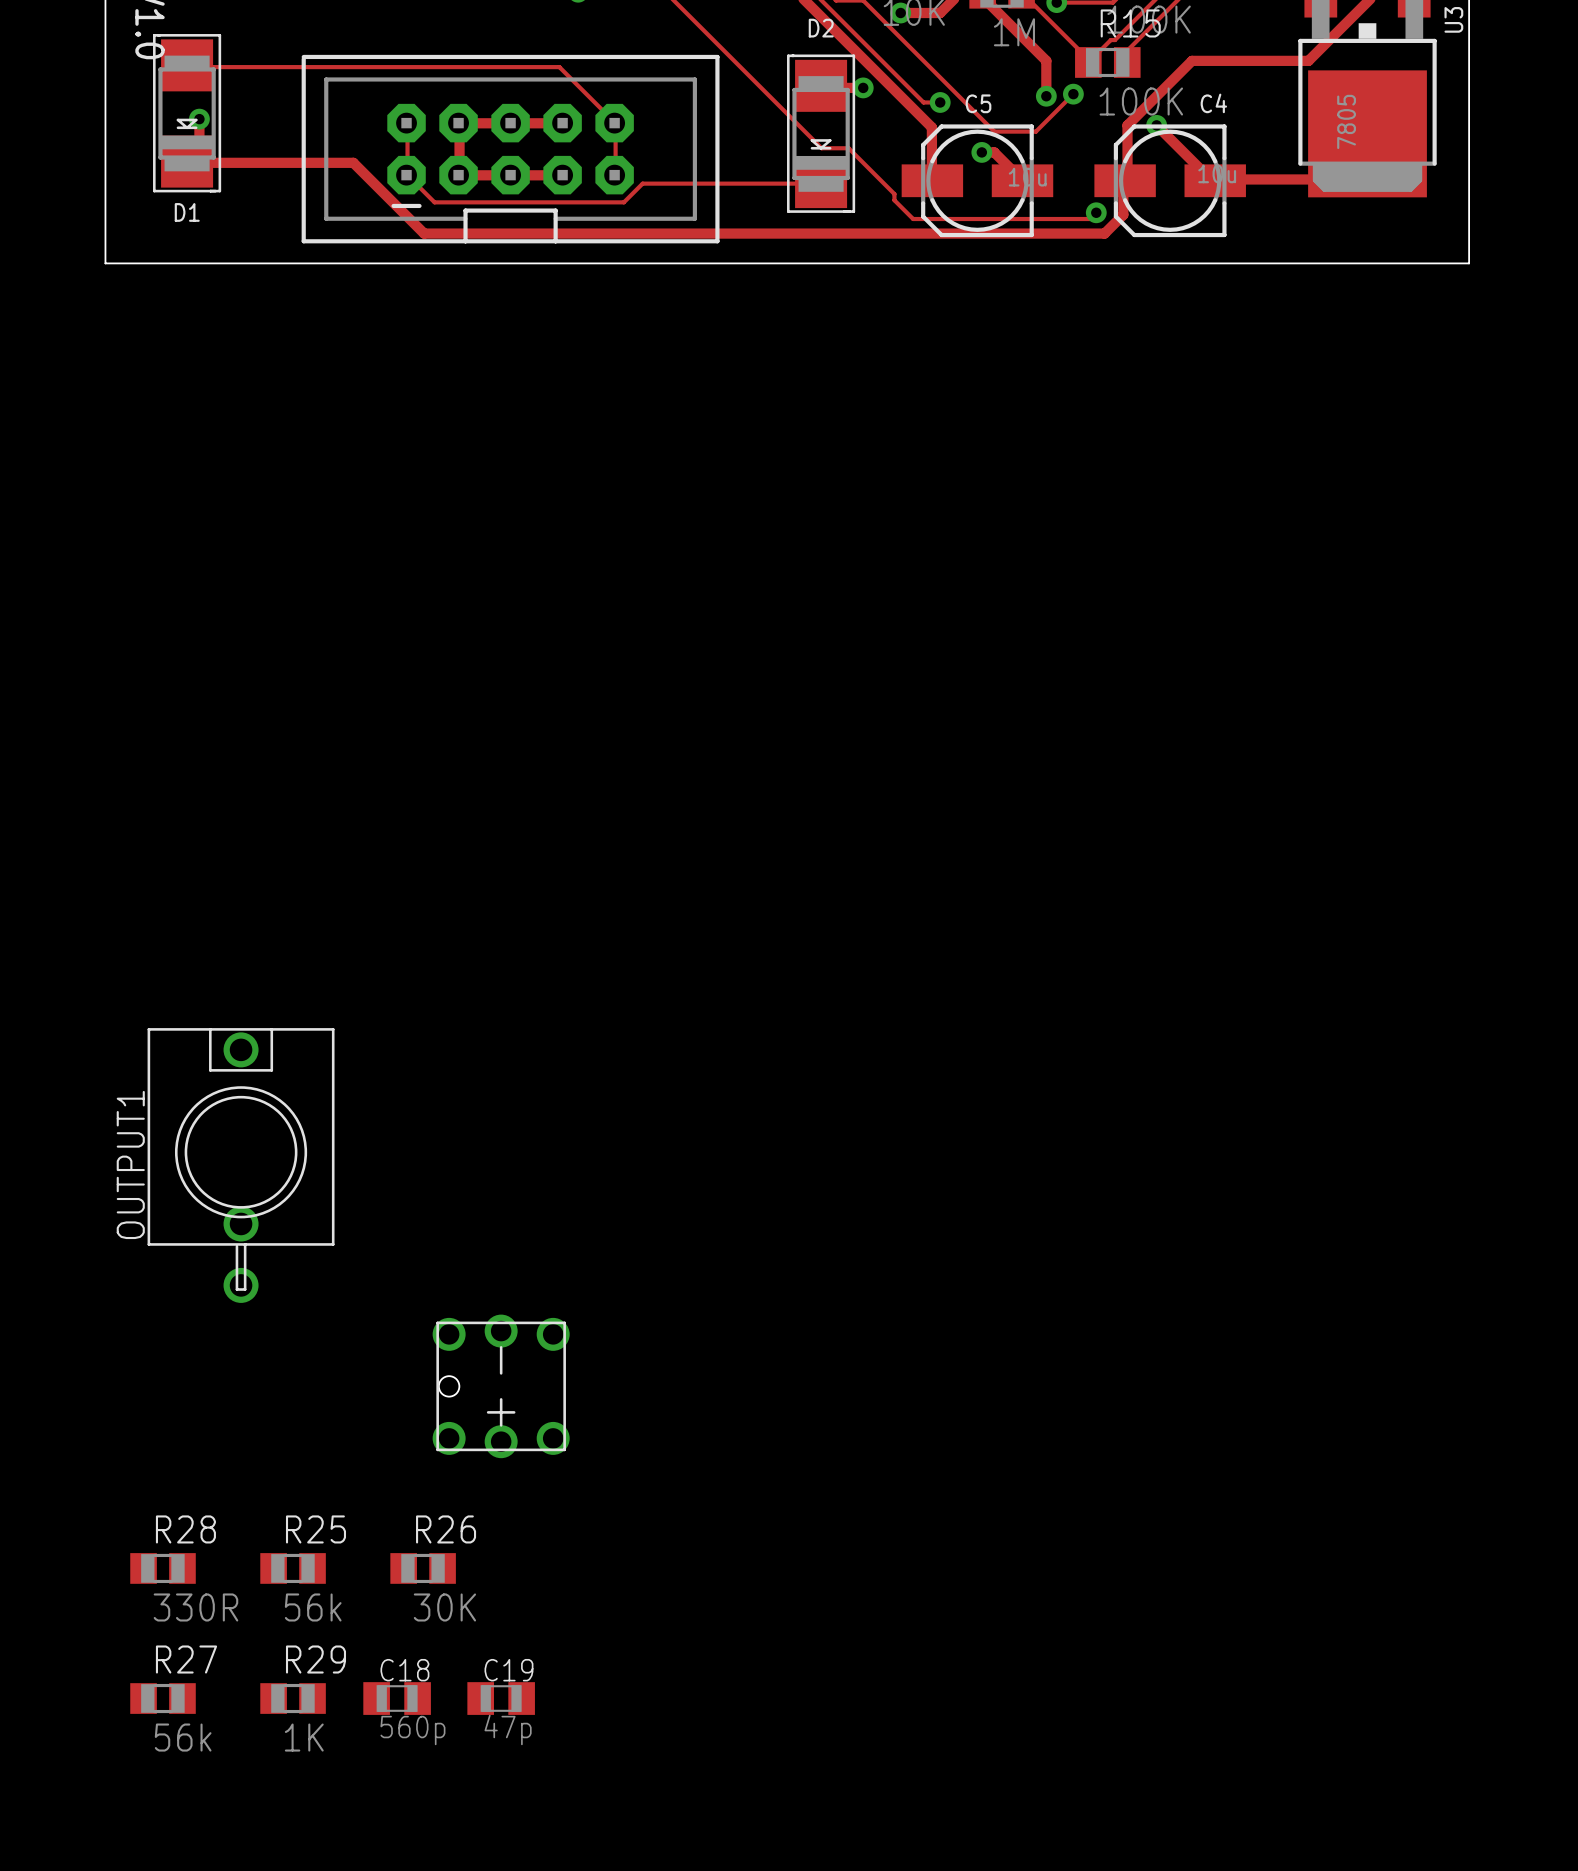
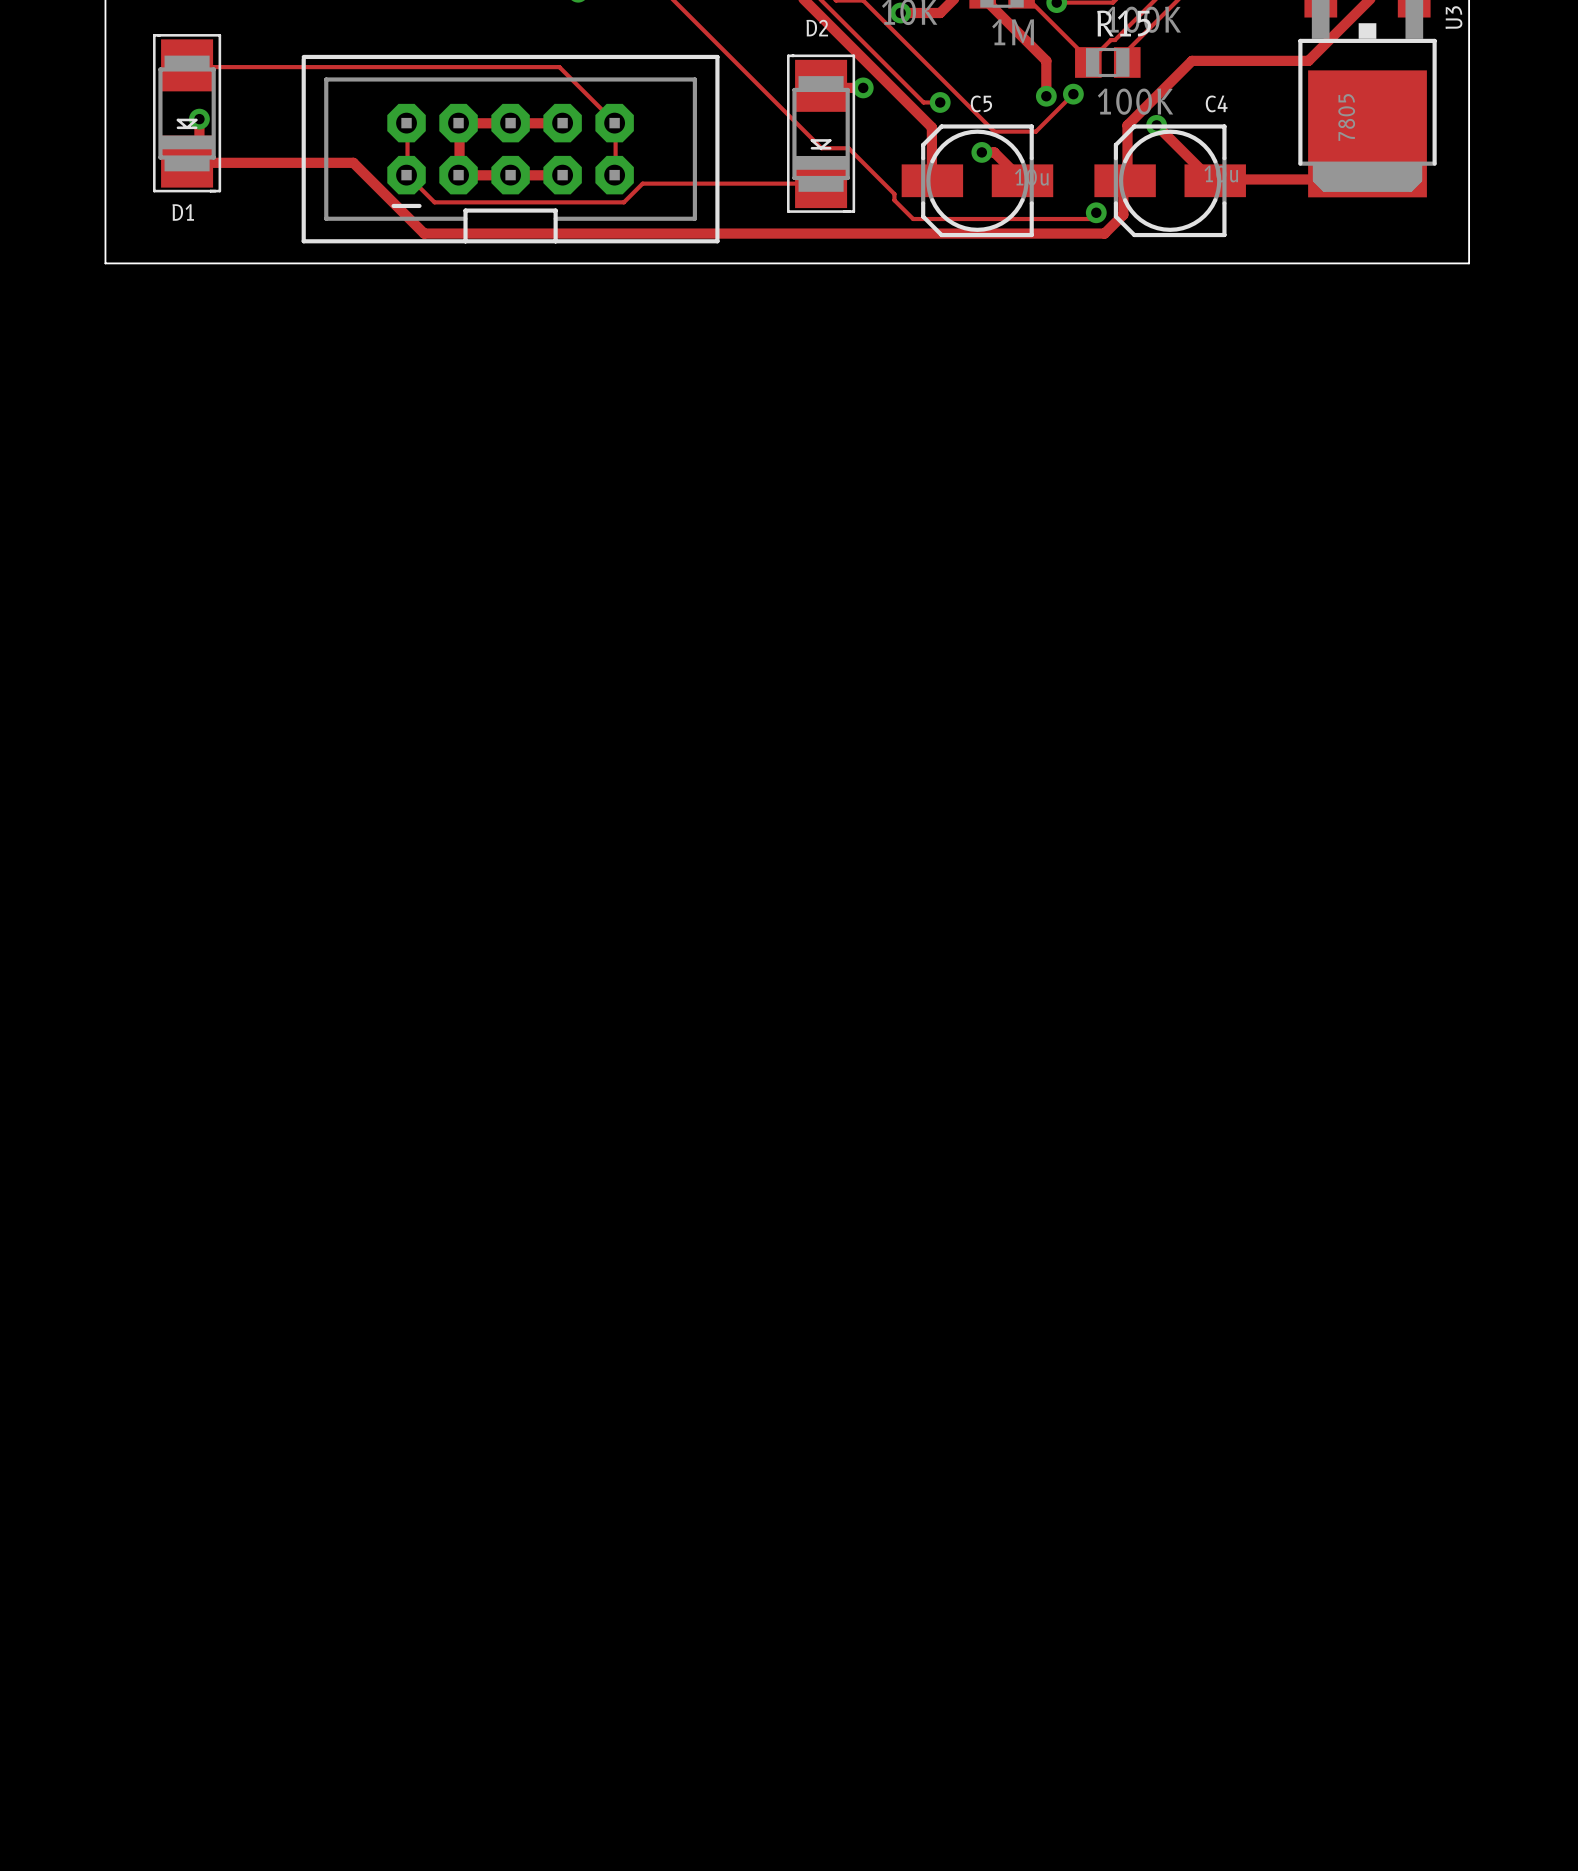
OUTPUT1: (241, 1165) -> none
part: (501, 1386) -> none
R28: 330R (163, 1568) -> none
R25: 56k (293, 1568) -> none
R26: 30K (423, 1568) -> none
R27: 56k (163, 1698) -> none
R29: 1K (293, 1698) -> none
C18: 560p (397, 1698) -> none
C19: 47p (501, 1698) -> none

